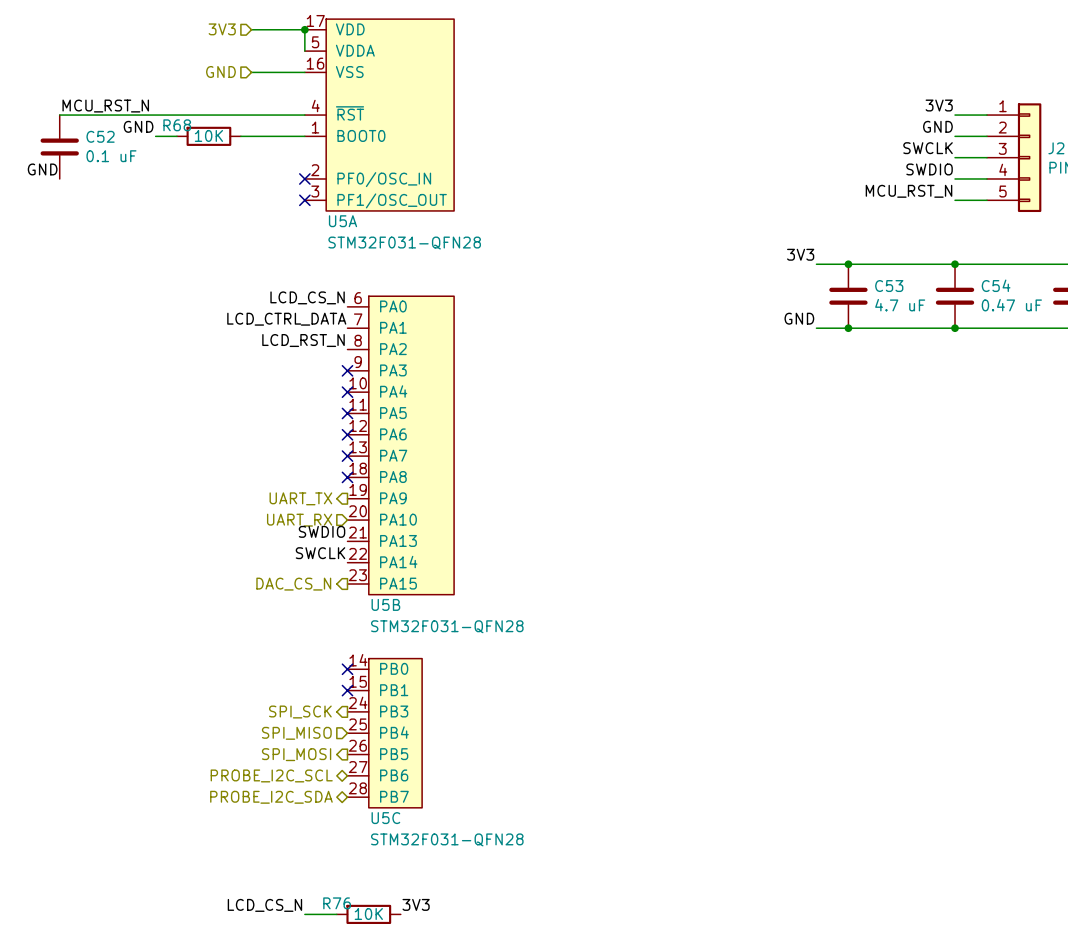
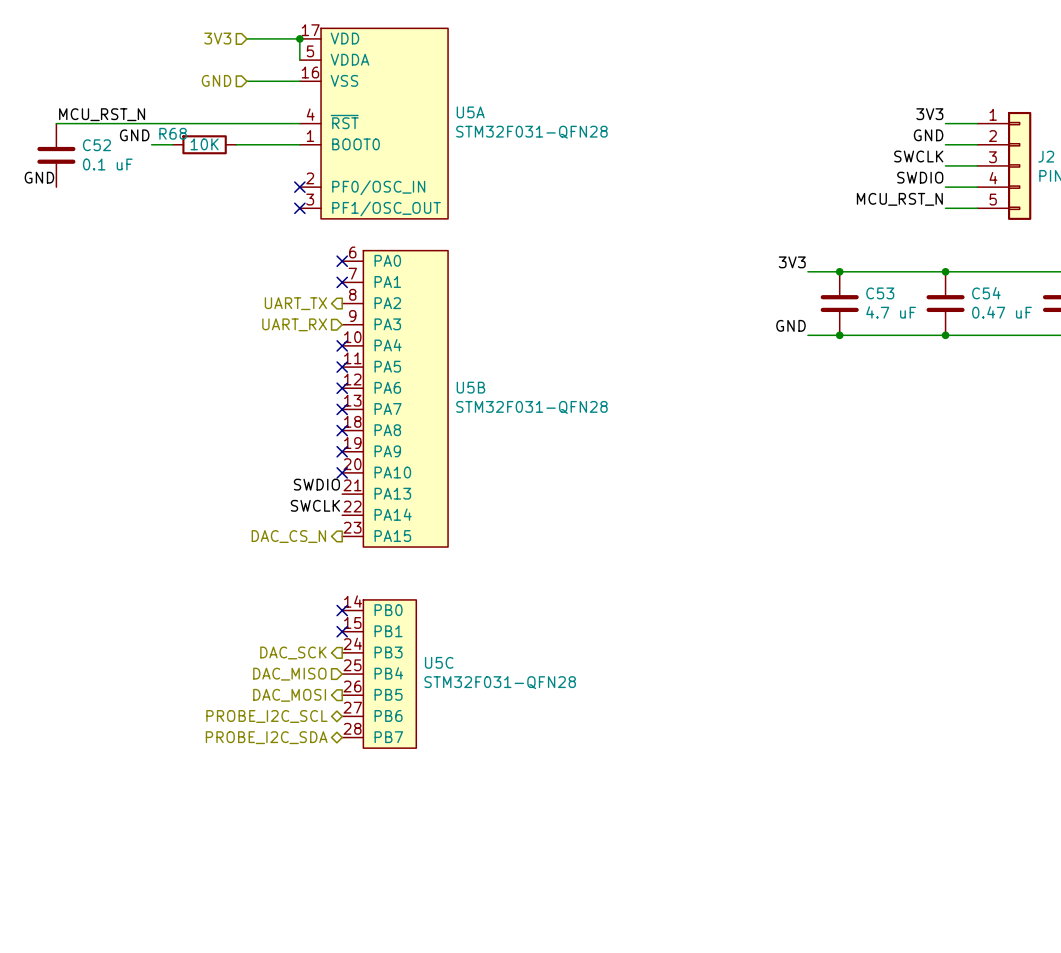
U5A name position: U5A (343, 221) -> U5A (470, 112)
U5A value position: STM32F031-QFN28 (404, 243) -> STM32F031-QFN28 (531, 132)
no-connect mark: none -> (342, 261)
no-connect mark: none -> (342, 282)
label: LCD_CS_N (307, 297) -> none
label: LCD_CTRL_DATA (286, 319) -> none
no-connect mark: none -> (342, 345)
label: LCD_RST_N (303, 340) -> none
no-connect mark: none -> (342, 367)
no-connect mark: (347, 370) -> none
no-connect mark: none -> (342, 388)
no-connect mark: (347, 392) -> none
no-connect mark: none -> (342, 409)
no-connect mark: (347, 413) -> none
no-connect mark: none -> (342, 430)
no-connect mark: (347, 434) -> none
no-connect mark: none -> (342, 451)
U5B position: (400, 445) -> (395, 398)
no-connect mark: (347, 456) -> none
no-connect mark: none -> (342, 472)
no-connect mark: (347, 477) -> none
hierarchical label position: UART_TX (300, 498) -> UART_TX (295, 303)
hierarchical label position: UART_RX (299, 520) -> UART_RX (294, 324)
label position: SWDIO (322, 531) -> SWDIO (316, 484)
label position: SWCLK (320, 553) -> SWCLK (315, 505)
hierarchical label position: DAC_CS_N (293, 584) -> DAC_CS_N (288, 536)
U5B name position: U5B (385, 604) -> U5B (470, 387)
no-connect mark: none -> (342, 610)
no-connect mark: none -> (342, 631)
U5B value position: STM32F031-QFN28 (447, 626) -> STM32F031-QFN28 (531, 407)
hierarchical label: none -> DAC_SCK (293, 652)
hierarchical label: none -> DAC_MISO (289, 674)
no-connect mark: (347, 669) -> none
hierarchical label: none -> DAC_MOSI (289, 695)
no-connect mark: (347, 690) -> none
hierarchical label shape: output (300, 712) -> bidirectional (266, 716)
hierarchical label: SPI_SCK (300, 712) -> PROBE_I2C_SCL (266, 716)
hierarchical label shape: input (296, 733) -> bidirectional (266, 737)
hierarchical label: SPI_MISO (296, 733) -> PROBE_I2C_SDA (266, 737)
U5C position: (384, 733) -> (379, 674)
hierarchical label: SPI_MOSI (296, 754) -> none
hierarchical label: PROBE_I2C_SCL (271, 775) -> none
hierarchical label: PROBE_I2C_SDA (271, 797) -> none
U5C name position: U5C (385, 818) -> U5C (439, 662)
U5C value position: STM32F031-QFN28 (447, 839) -> STM32F031-QFN28 (500, 682)
label: 3V3 (416, 904) -> none
label: LCD_CS_N (264, 905) -> none
wire: (304, 914) (336, 914) -> none
R76: 10K (368, 914) -> none

